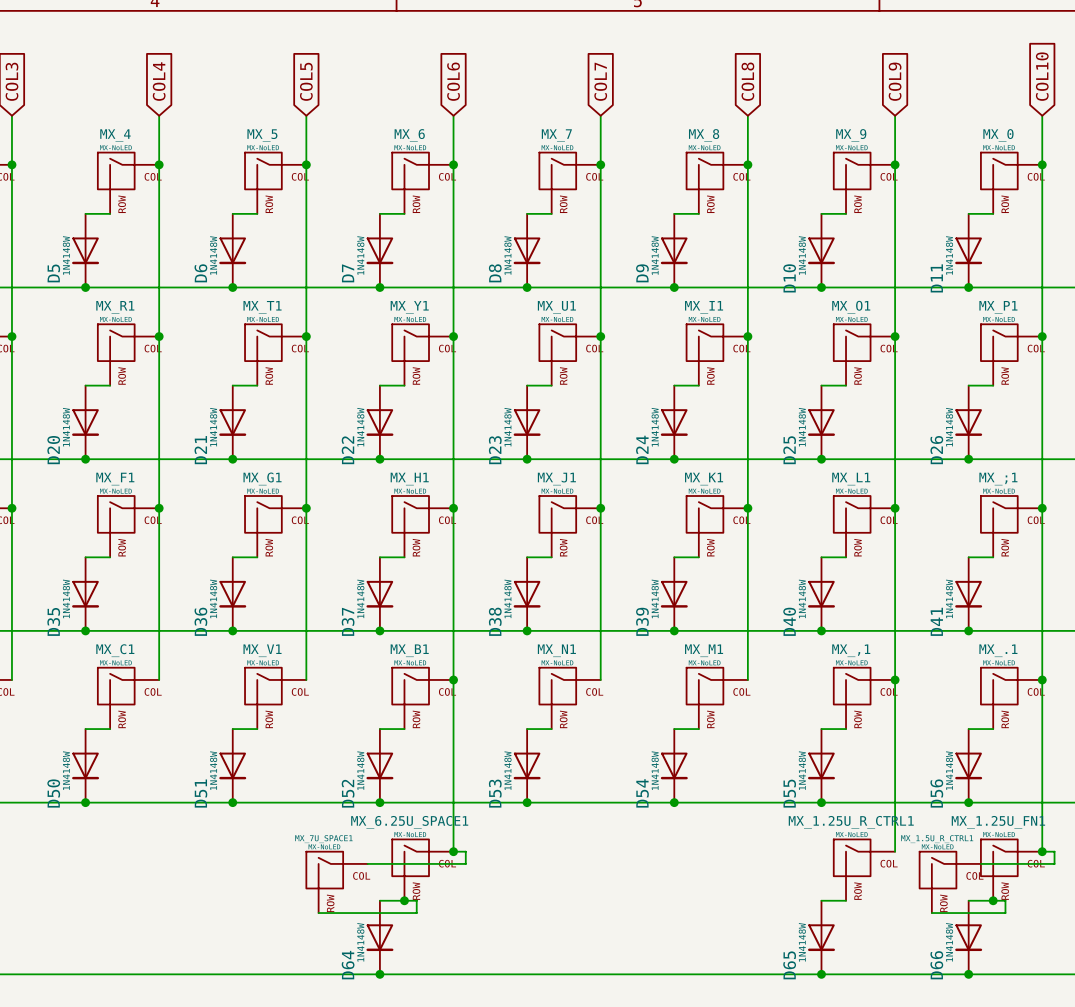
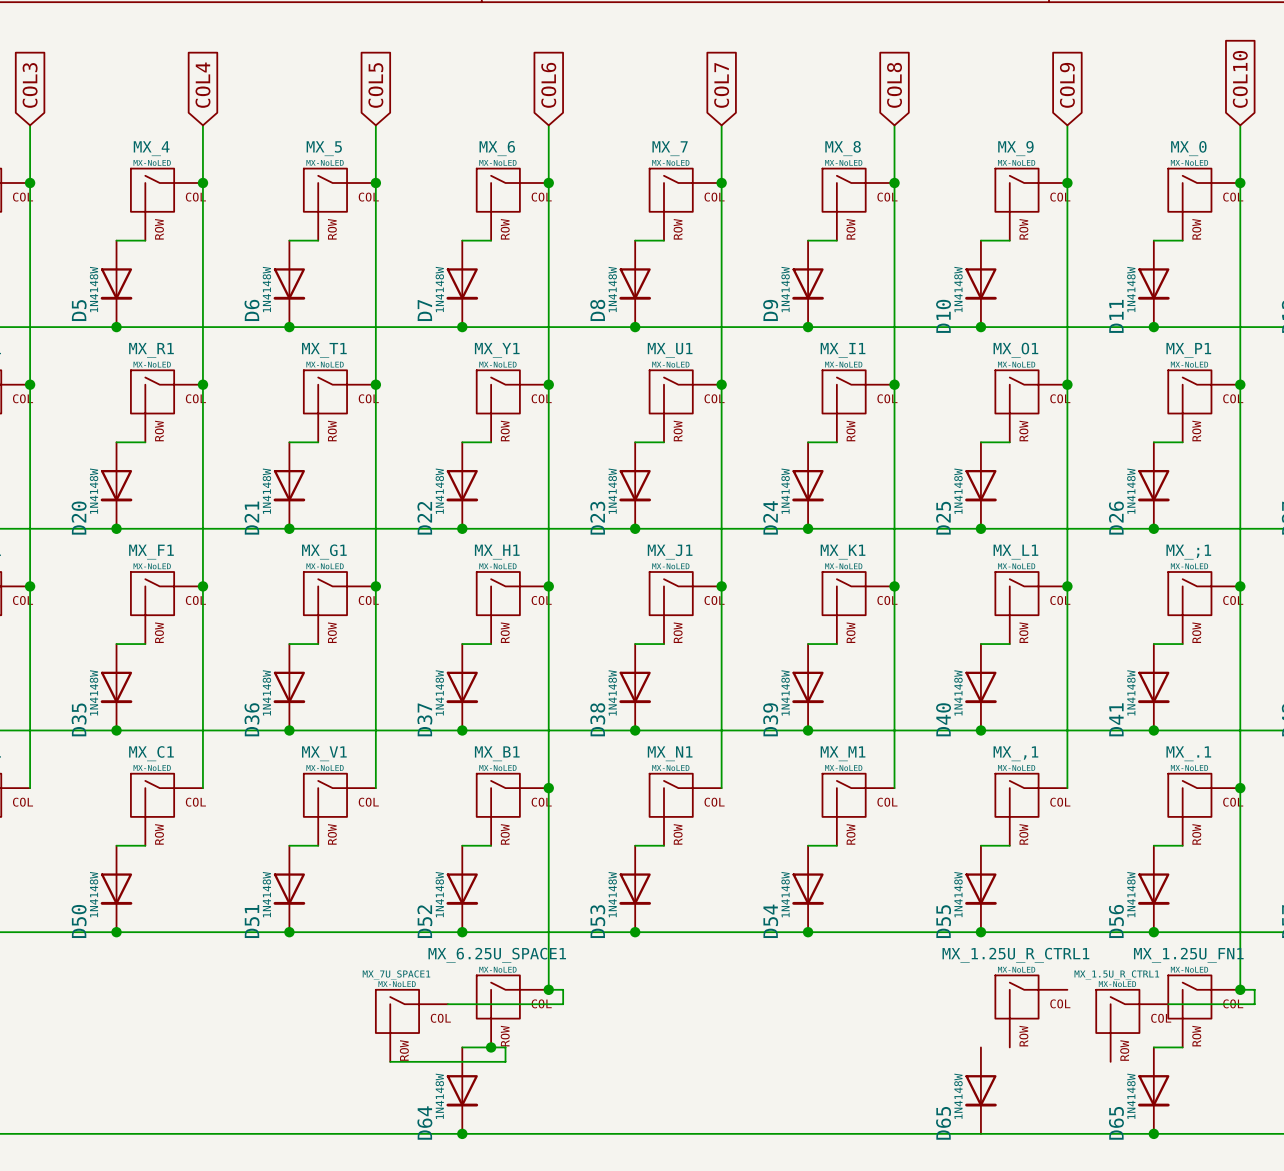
wire: (895, 679) (895, 851) -> none
junction: (895, 679) -> none
wire: (821, 900) (846, 900) -> none
wire: (993, 900) (1005, 900) (1005, 913) (931, 913) -> none
junction: (993, 900) -> none
D66 name: D66 (936, 965) -> D65 (1116, 1123)
junction: (821, 974) -> none

